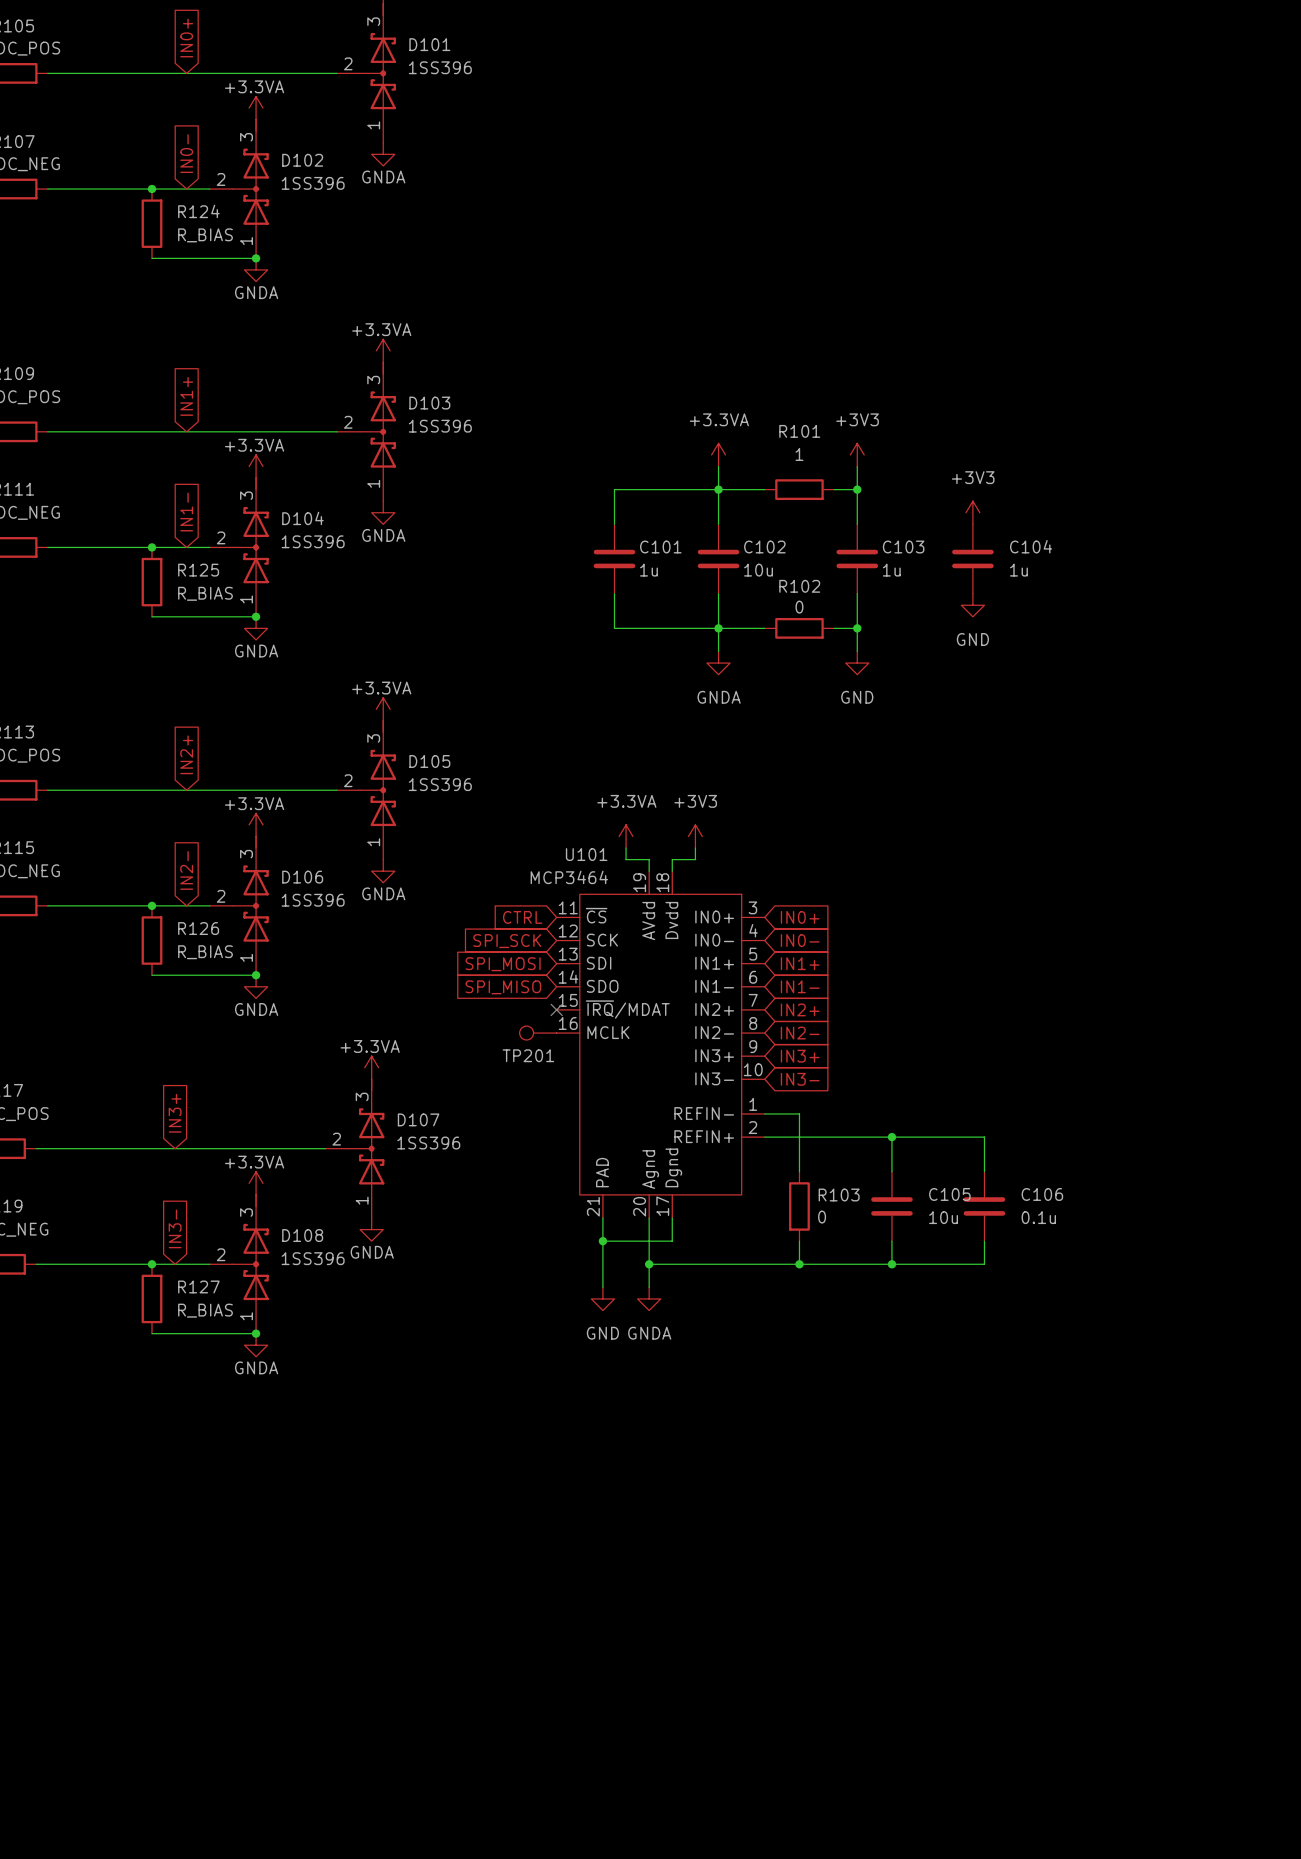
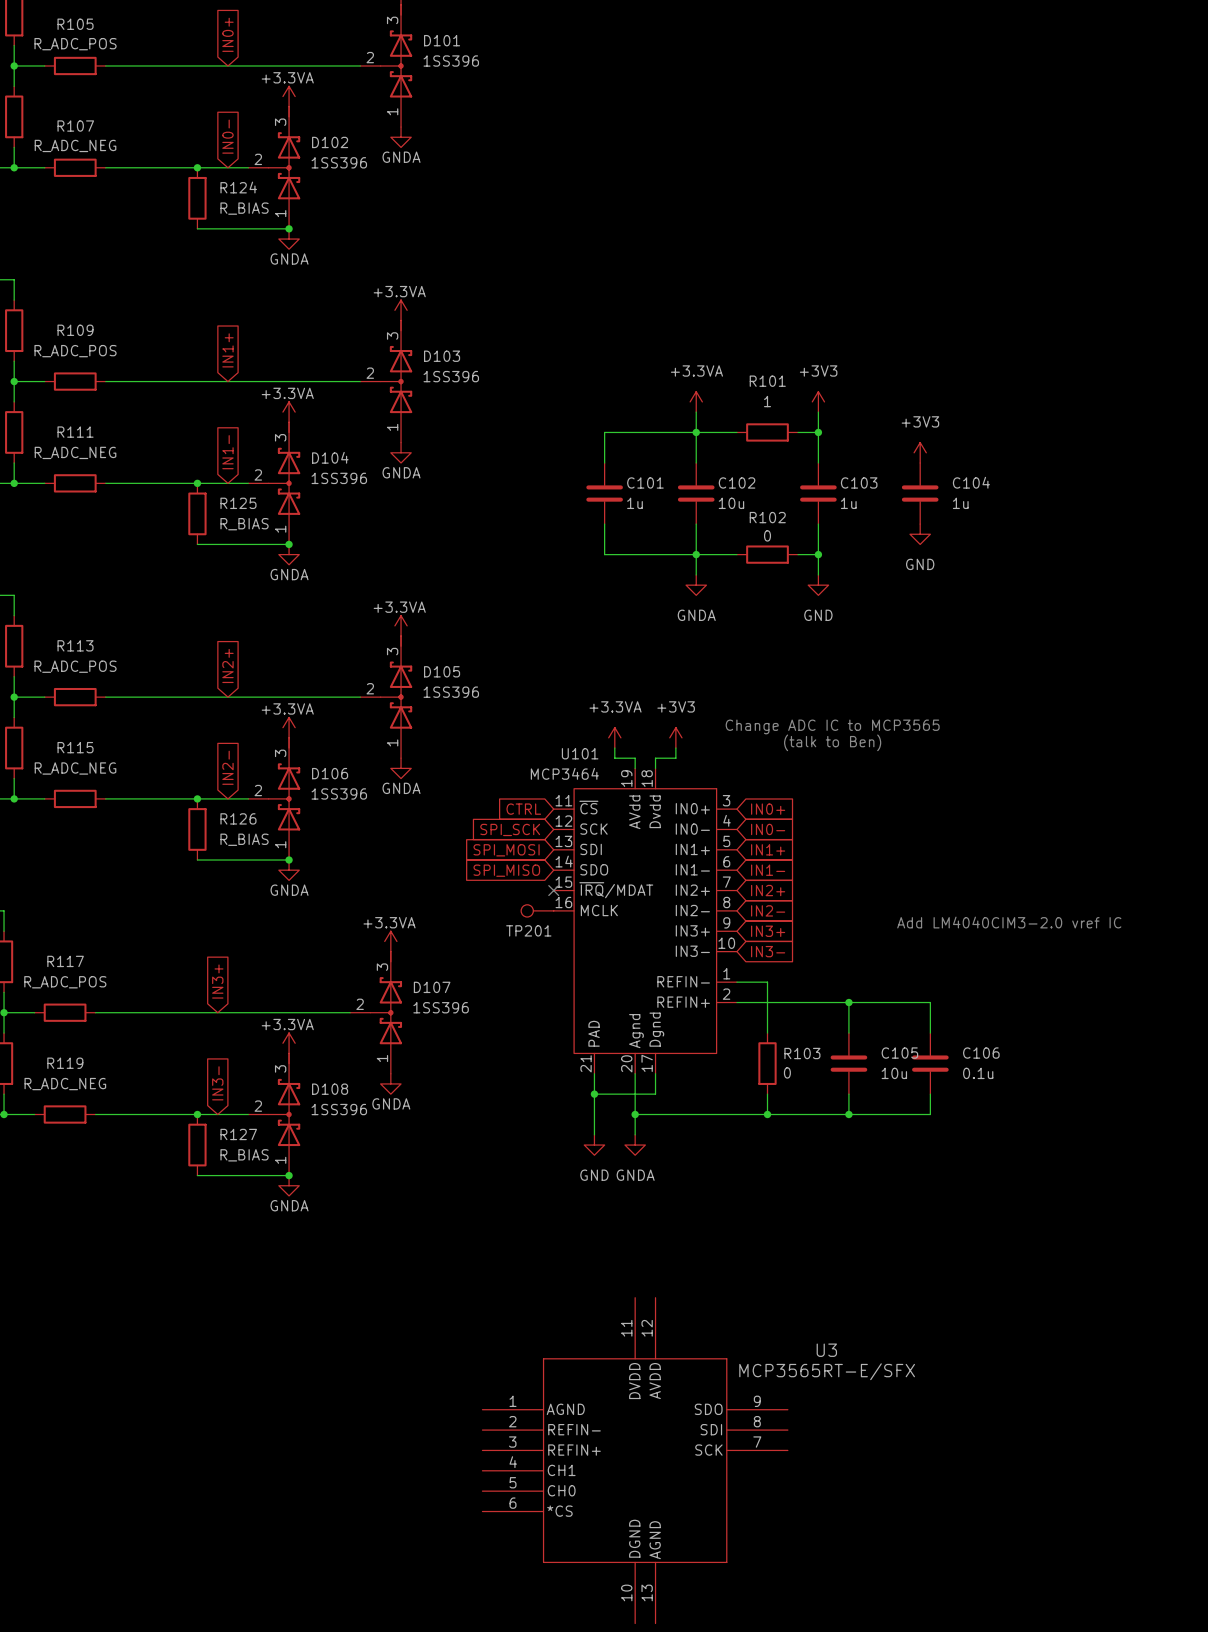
text: none -> Change ADC IC to MCP3565 (832, 726)
text: none -> (talk to Ben) (832, 742)
text: none -> Add LM4040CIM3-2.0 vref IC (1009, 922)
U3: none -> MCP3565RT-E/SFX (635, 1460)

